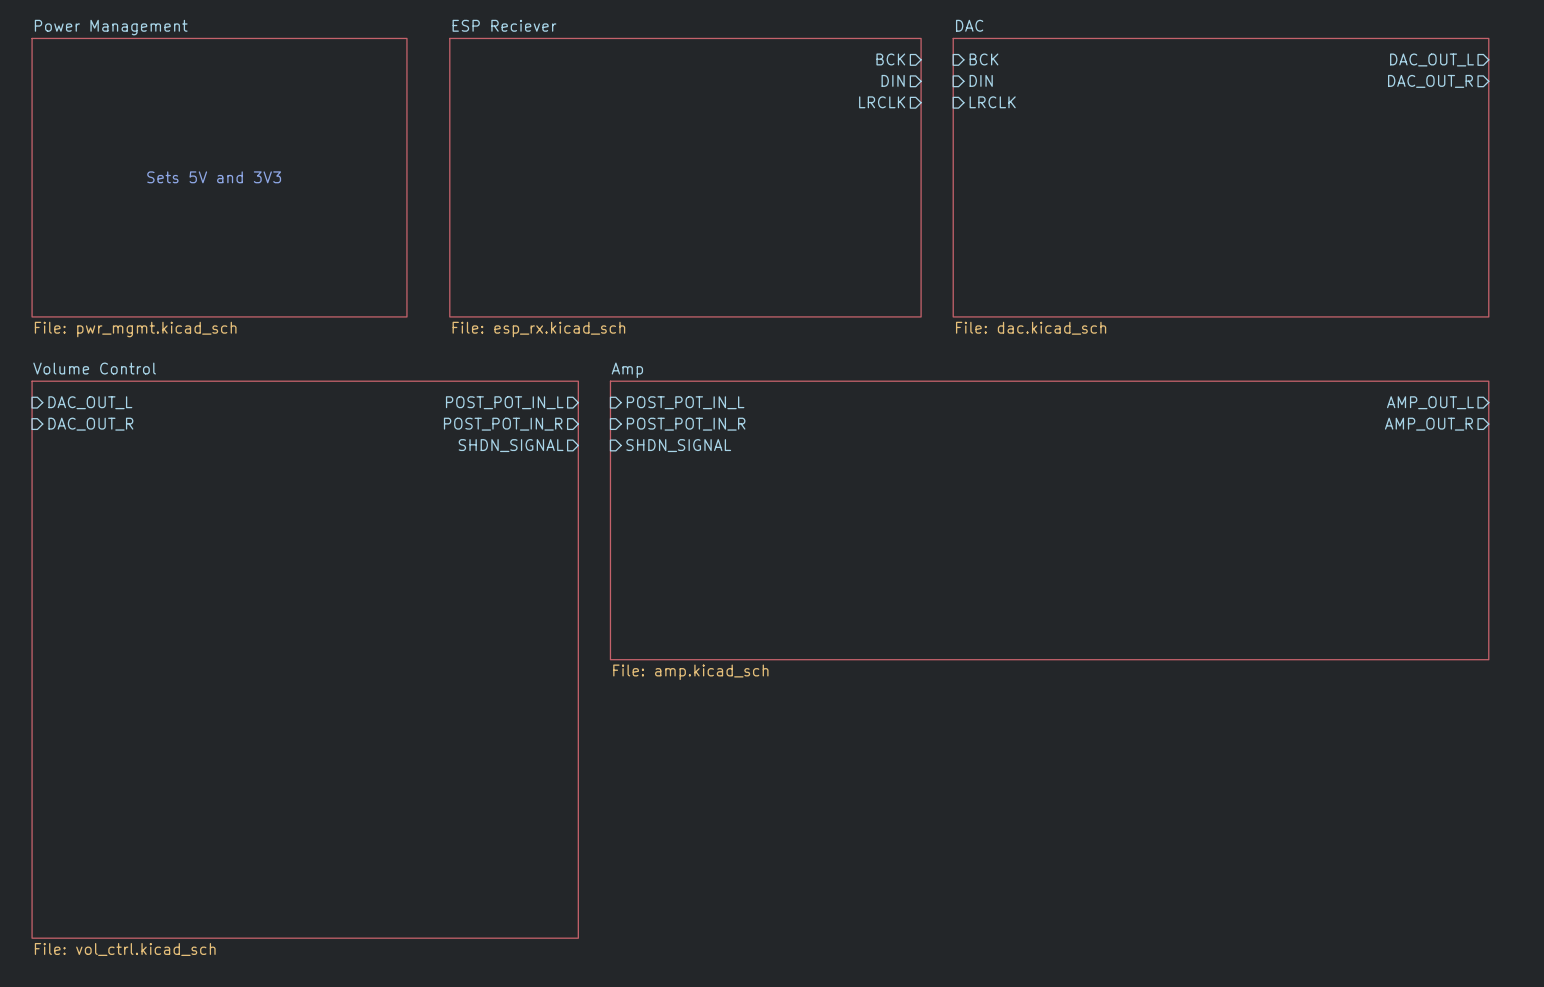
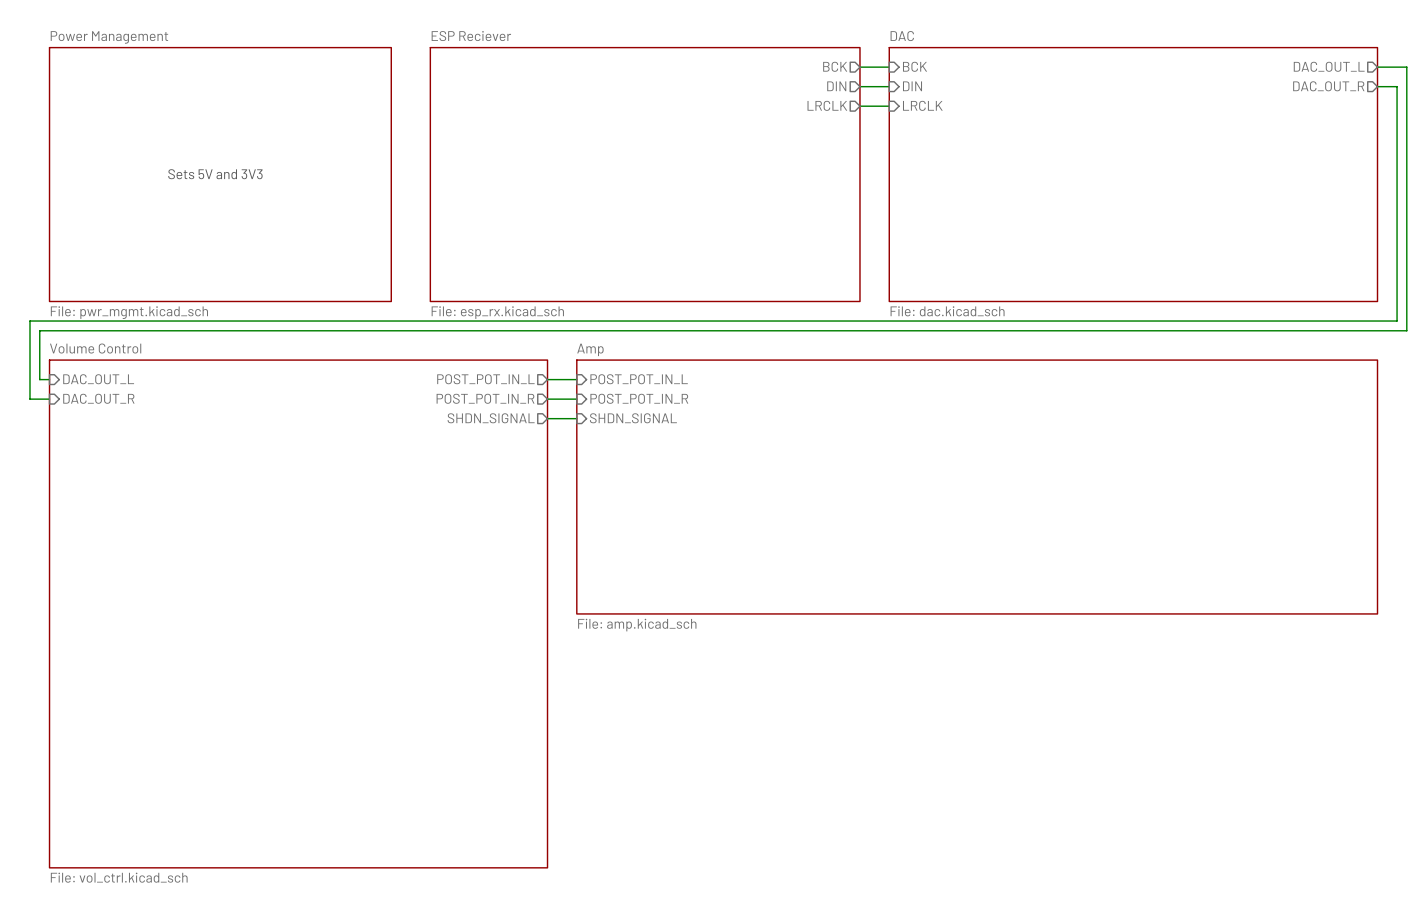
wire: none -> (859, 67) (889, 67)
wire: none -> (1377, 67) (1406, 67) (1406, 330) (39, 330) (39, 379) (49, 379)
wire: none -> (859, 86) (889, 86)
wire: none -> (1377, 86) (1397, 86) (1397, 321) (29, 321) (29, 399) (49, 399)
wire: none -> (859, 106) (889, 106)
wire: none -> (547, 379) (576, 379)
sheet pin: AMP_OUT_L (1430, 402) -> none
wire: none -> (547, 399) (576, 399)
sheet pin: AMP_OUT_R (1428, 424) -> none
wire: none -> (547, 418) (576, 418)

